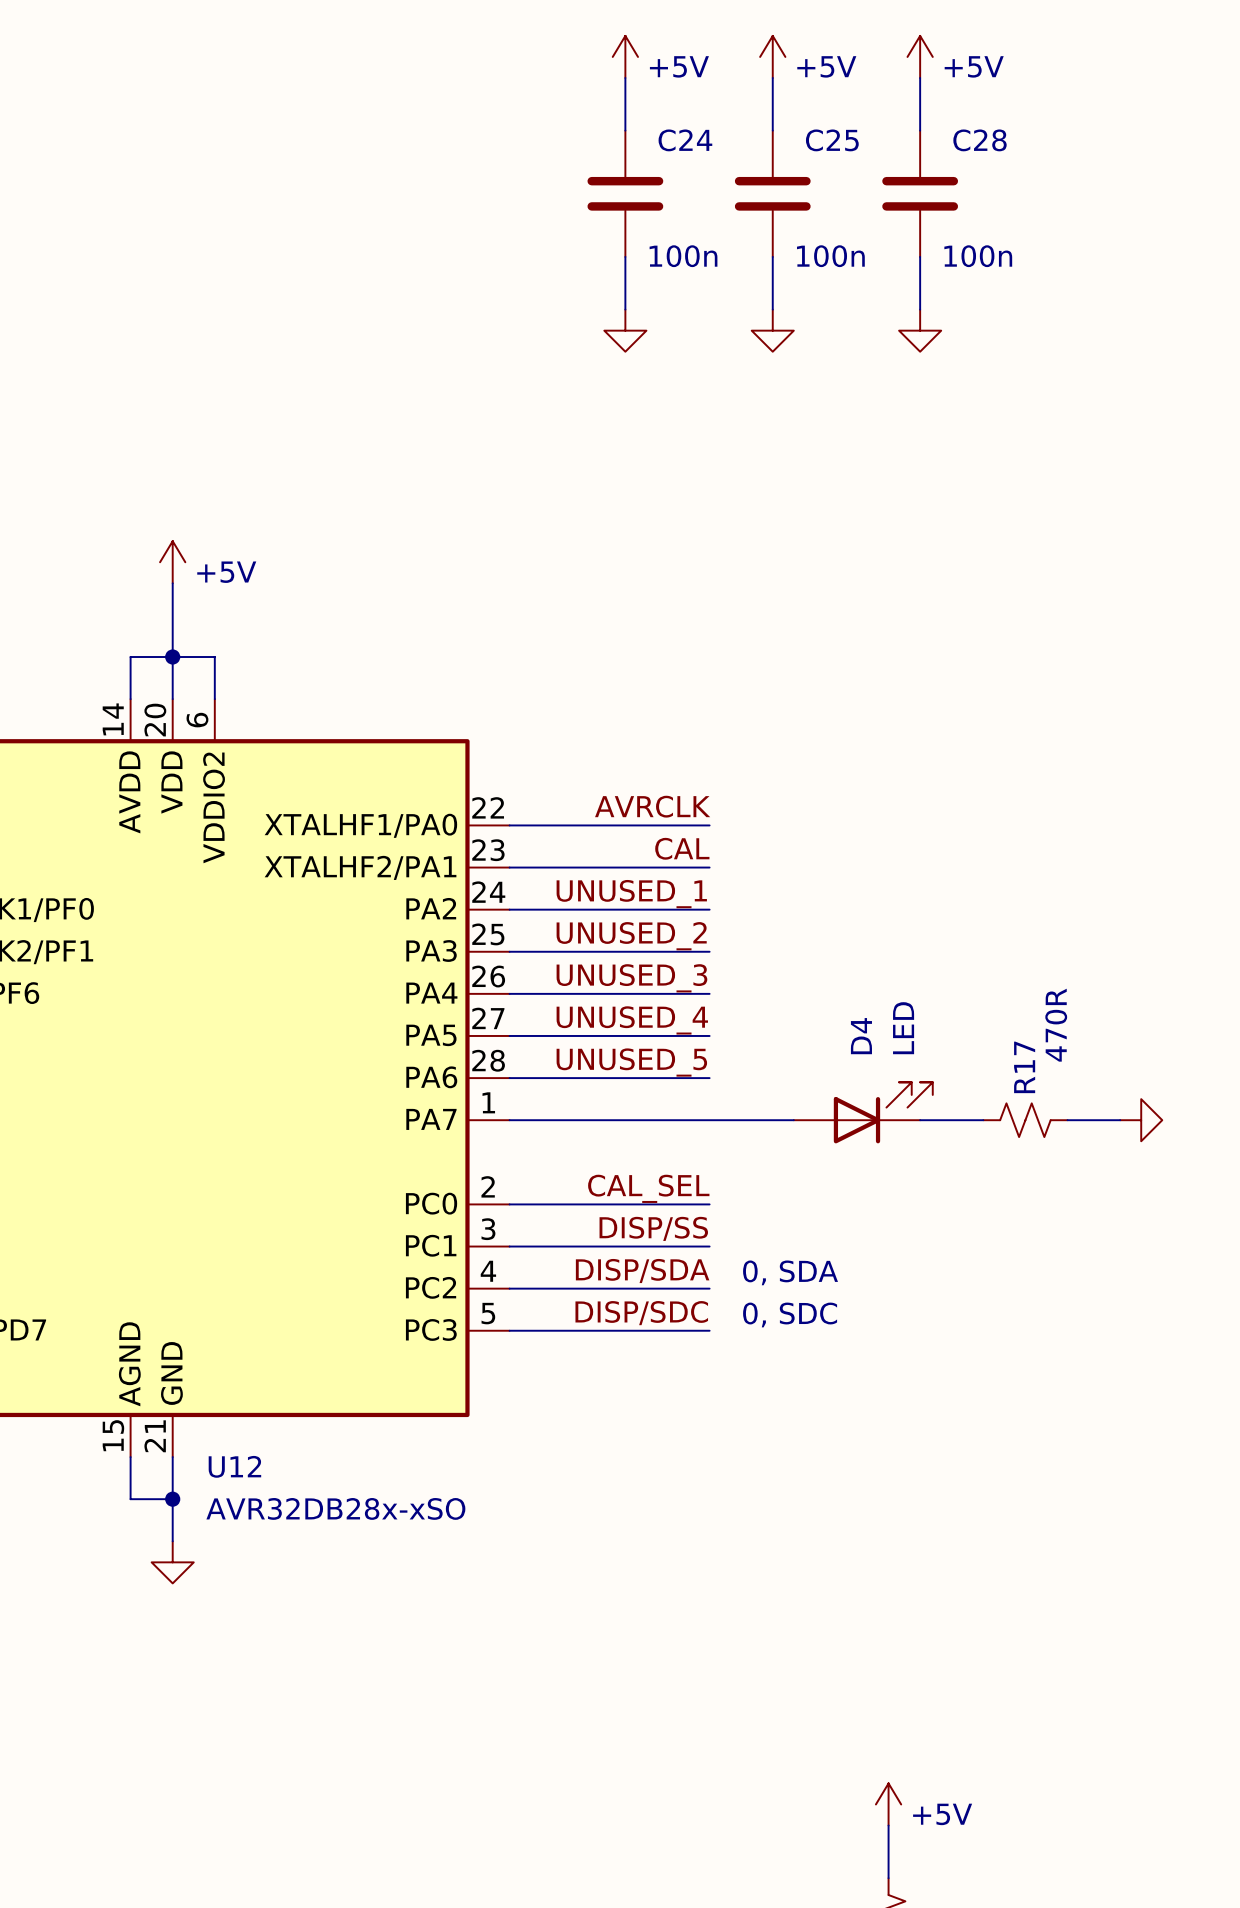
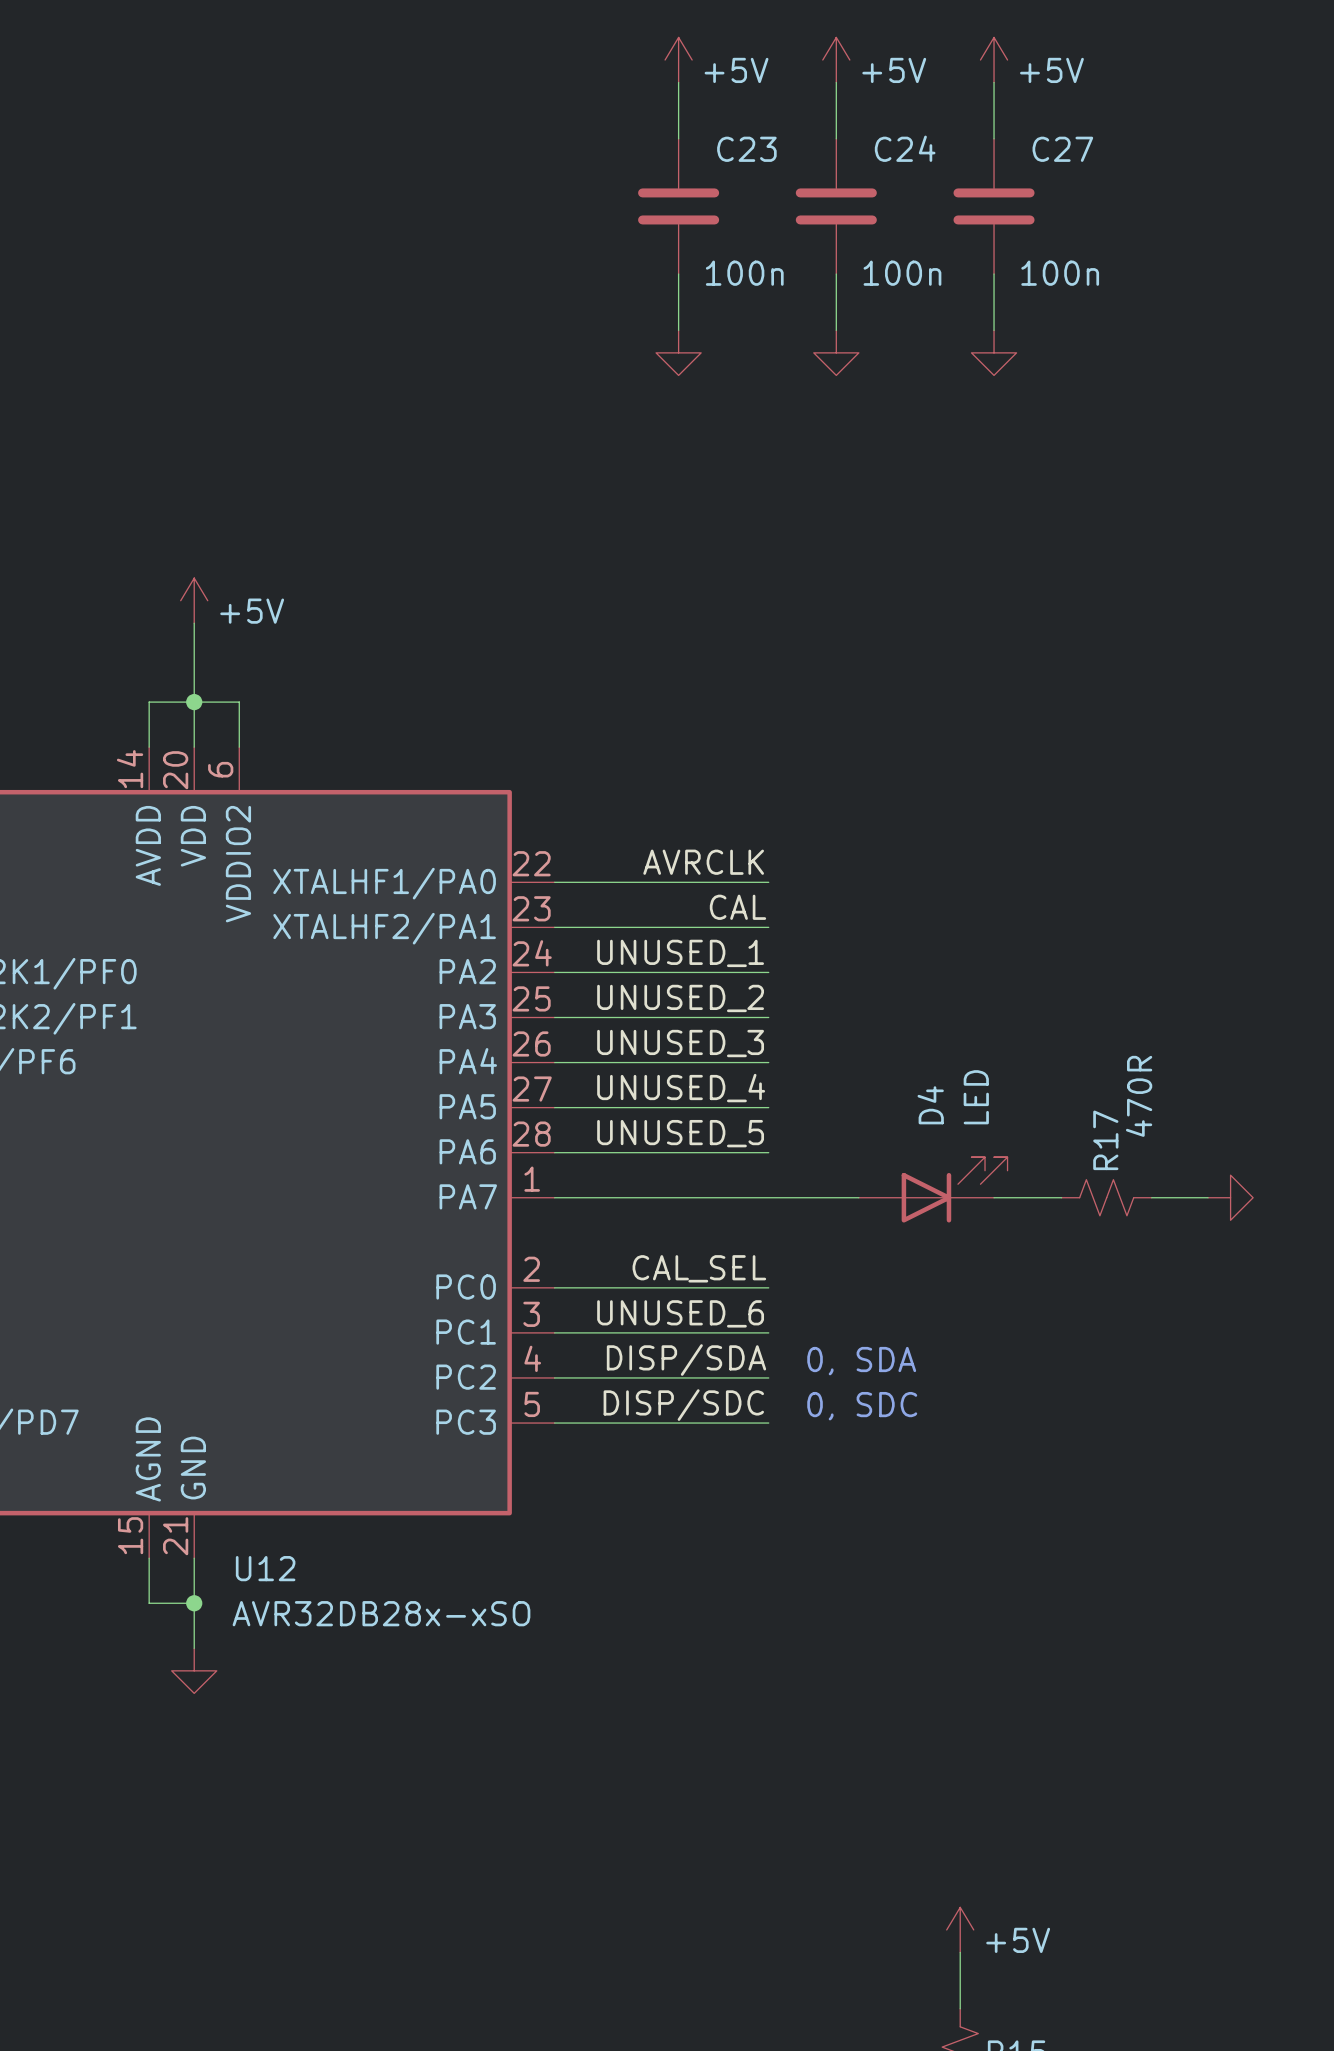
C24 name: C24 (685, 140) -> C23 (746, 149)
C25 name: C25 (832, 140) -> C24 (905, 148)
C28 name: C28 (980, 140) -> C27 (1062, 149)
label: DISP/SS (653, 1228) -> UNUSED_6 (680, 1313)

